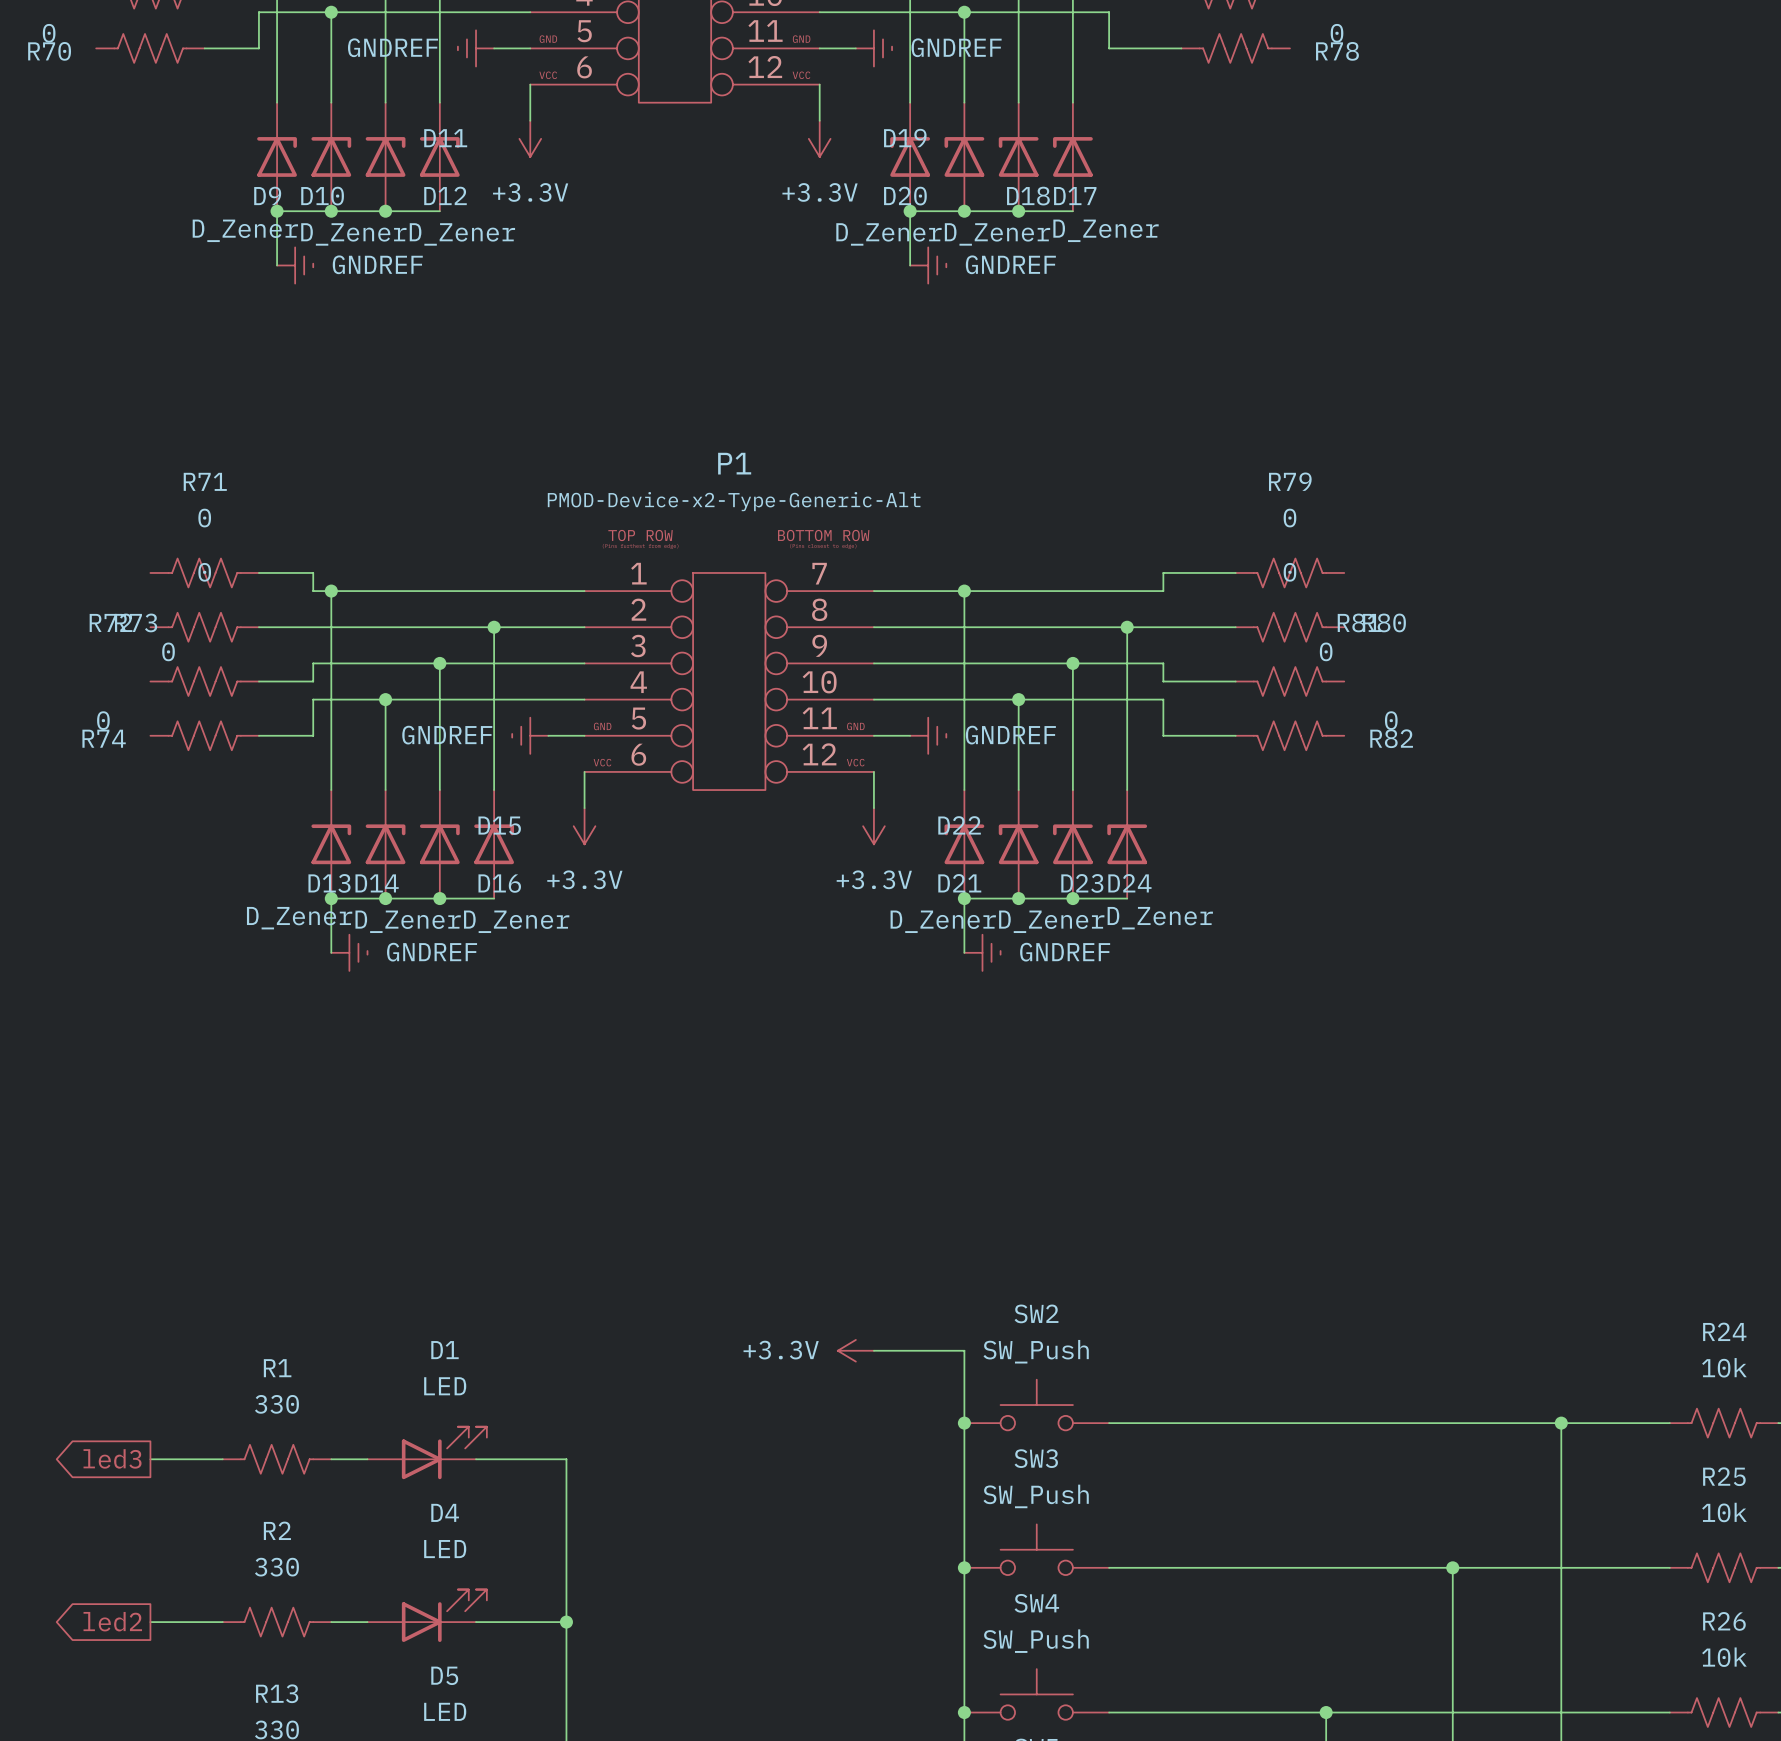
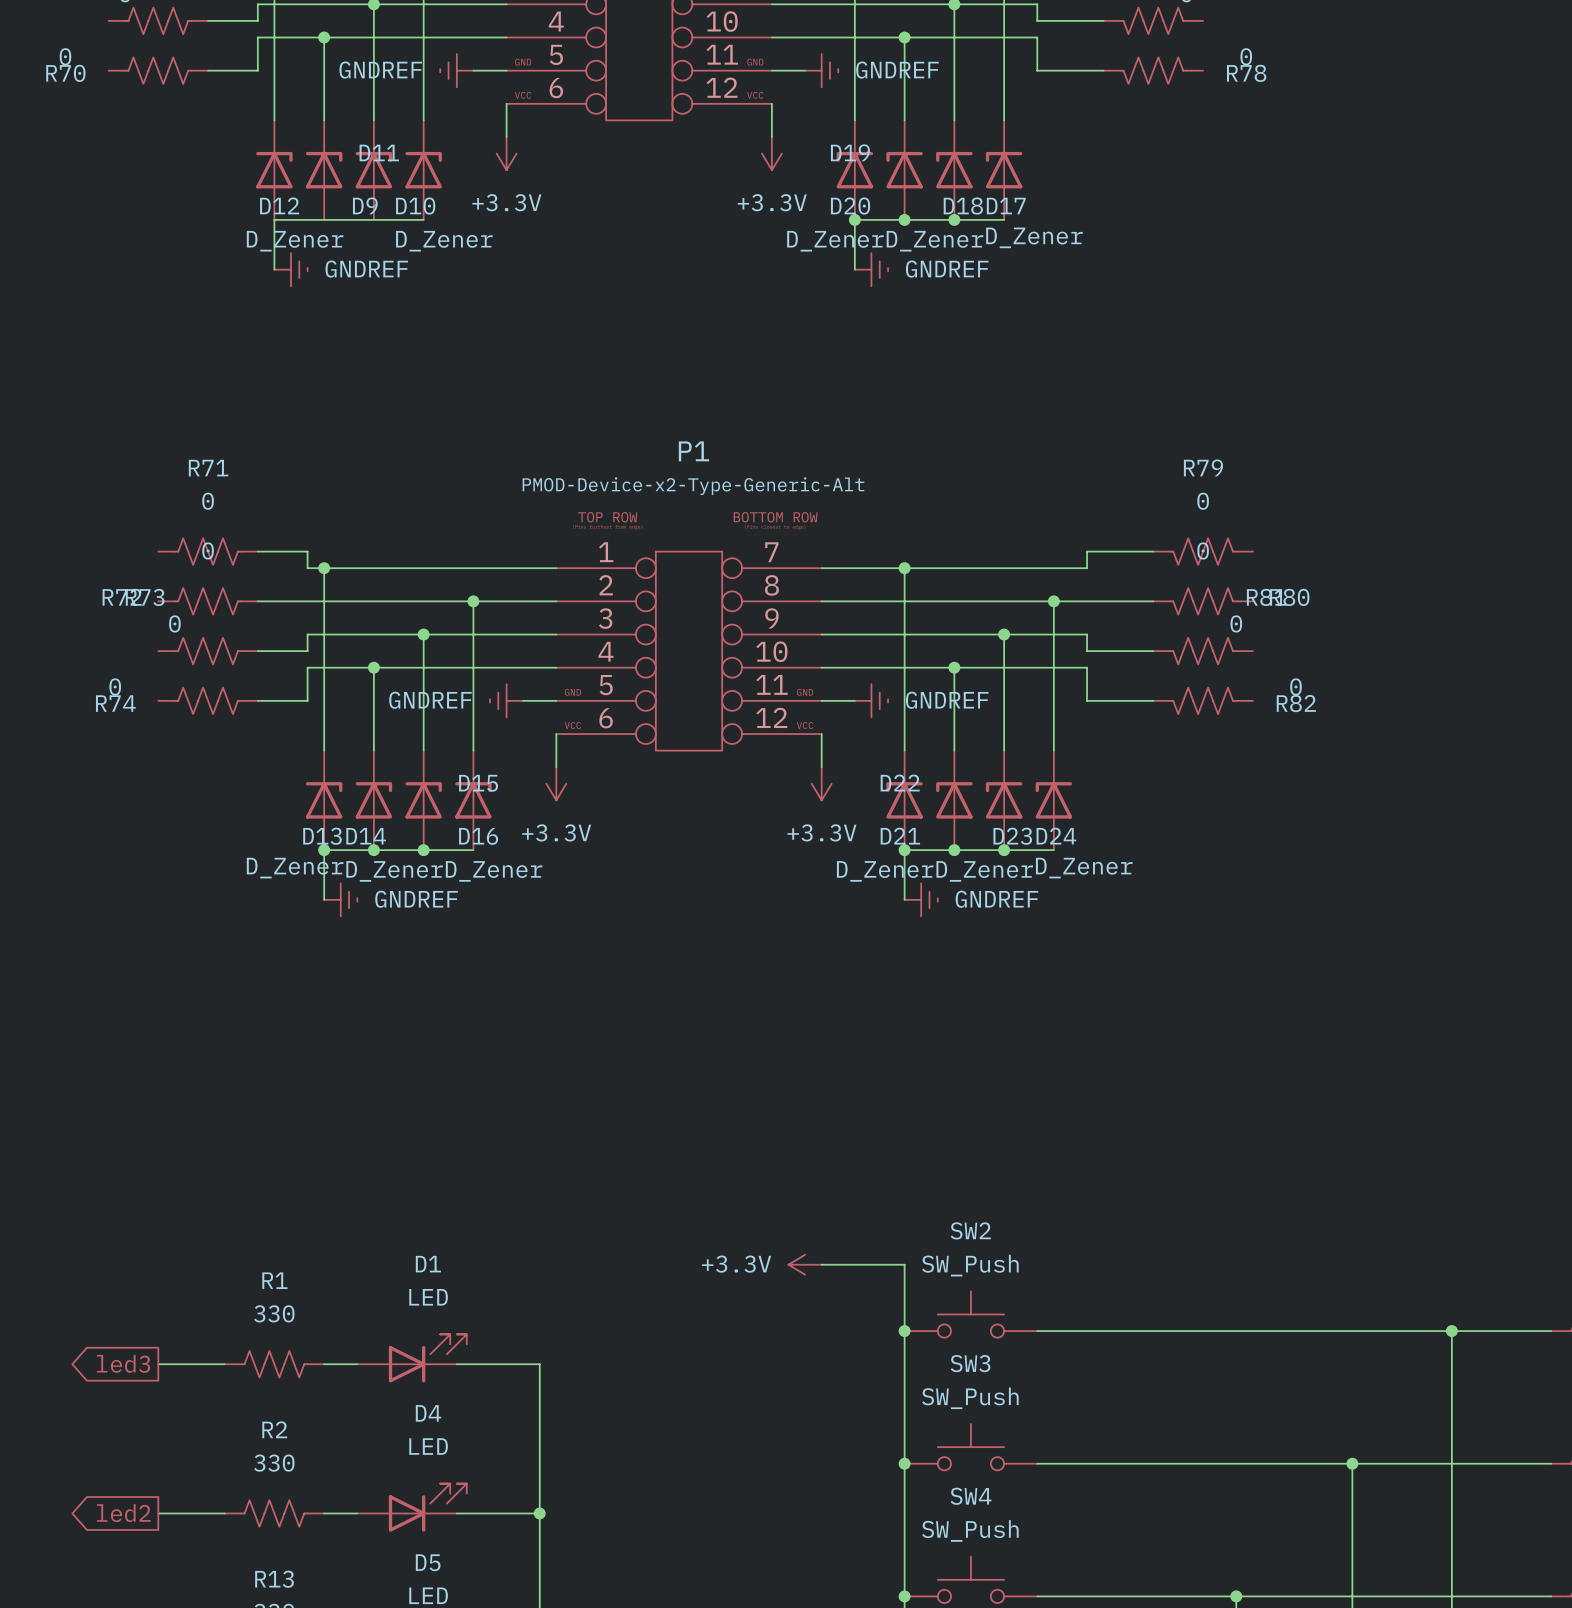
D11 name: D11 (445, 138) -> D9 (365, 205)
D9 name: D9 (267, 195) -> D12 (279, 205)
D12 name: D12 (445, 195) -> D10 (415, 206)
D10 name: D10 (322, 196) -> D11 (379, 152)
junction: (277, 211) -> none
junction: (331, 211) -> none
junction: (385, 211) -> none
D9 value position: D_Zener (245, 230) -> D_Zener (295, 241)
D10 value: D_Zener (353, 234) -> none

